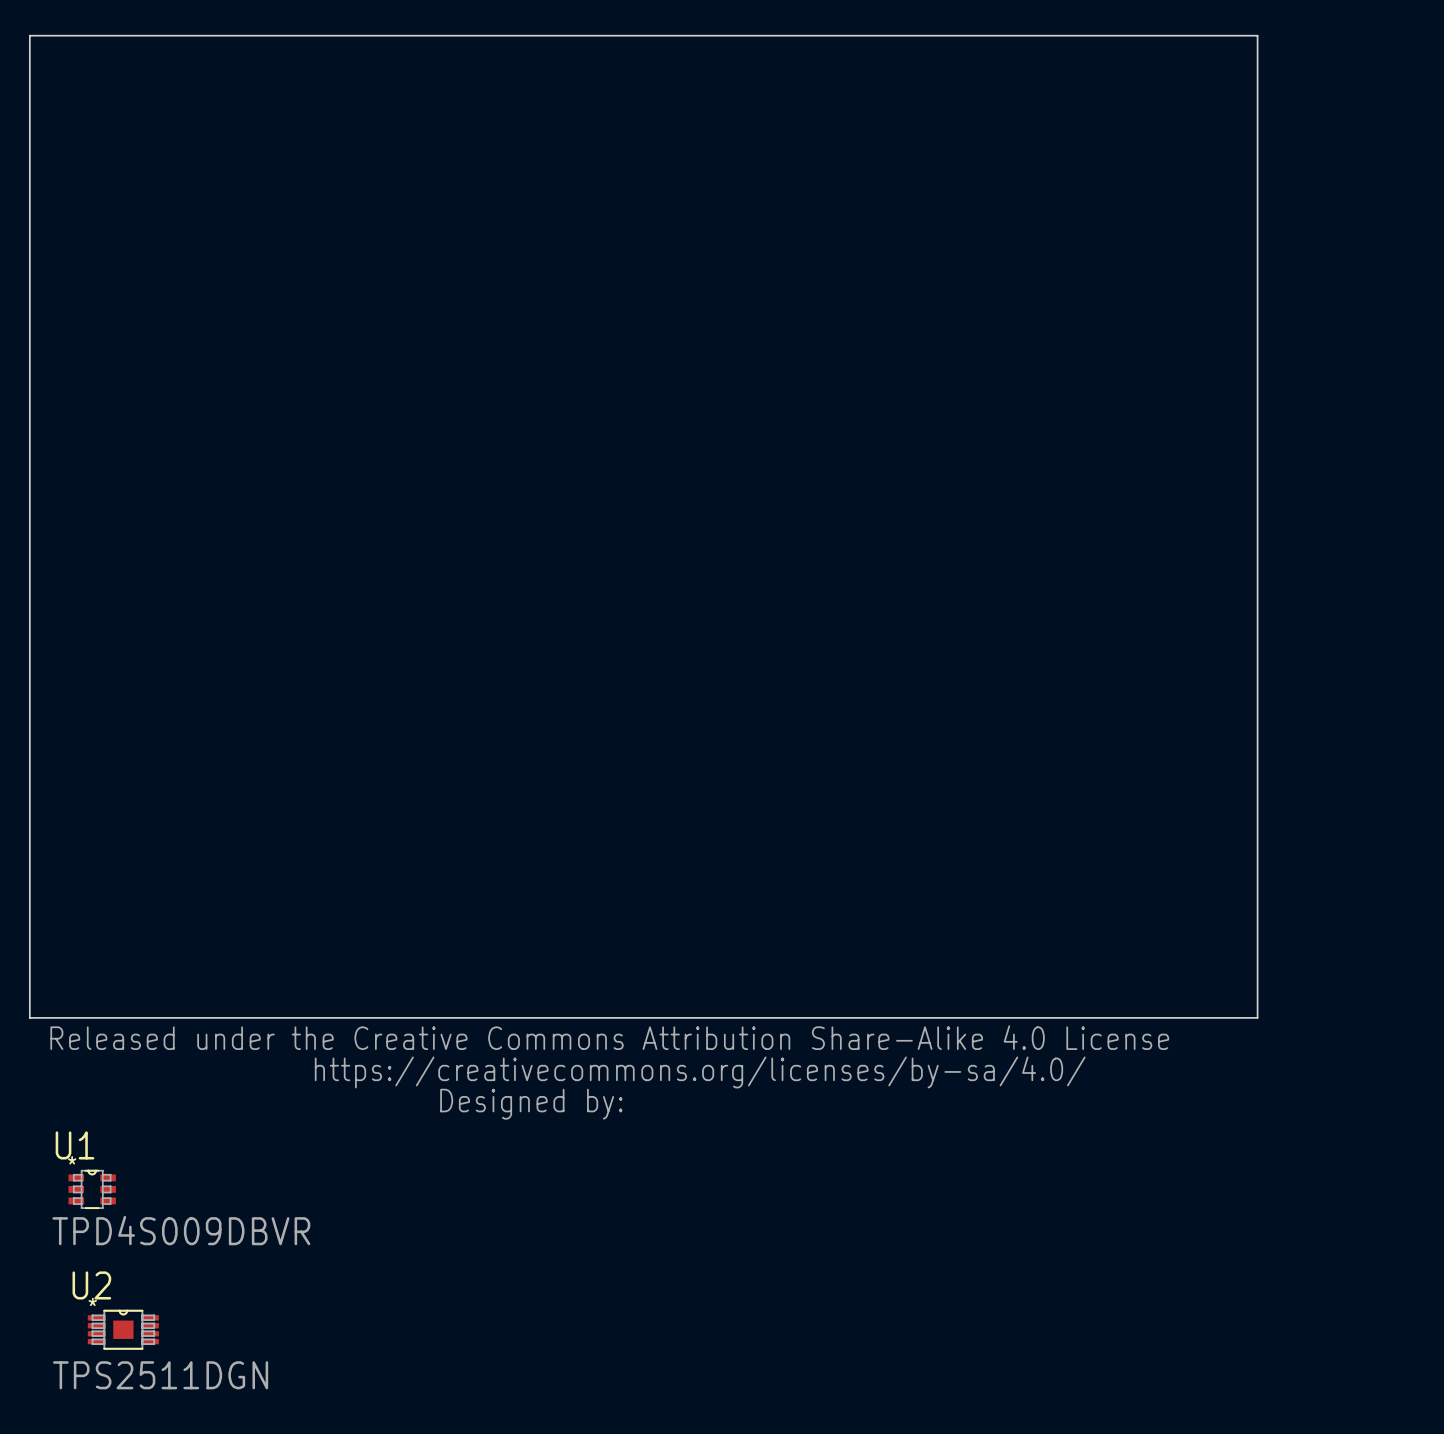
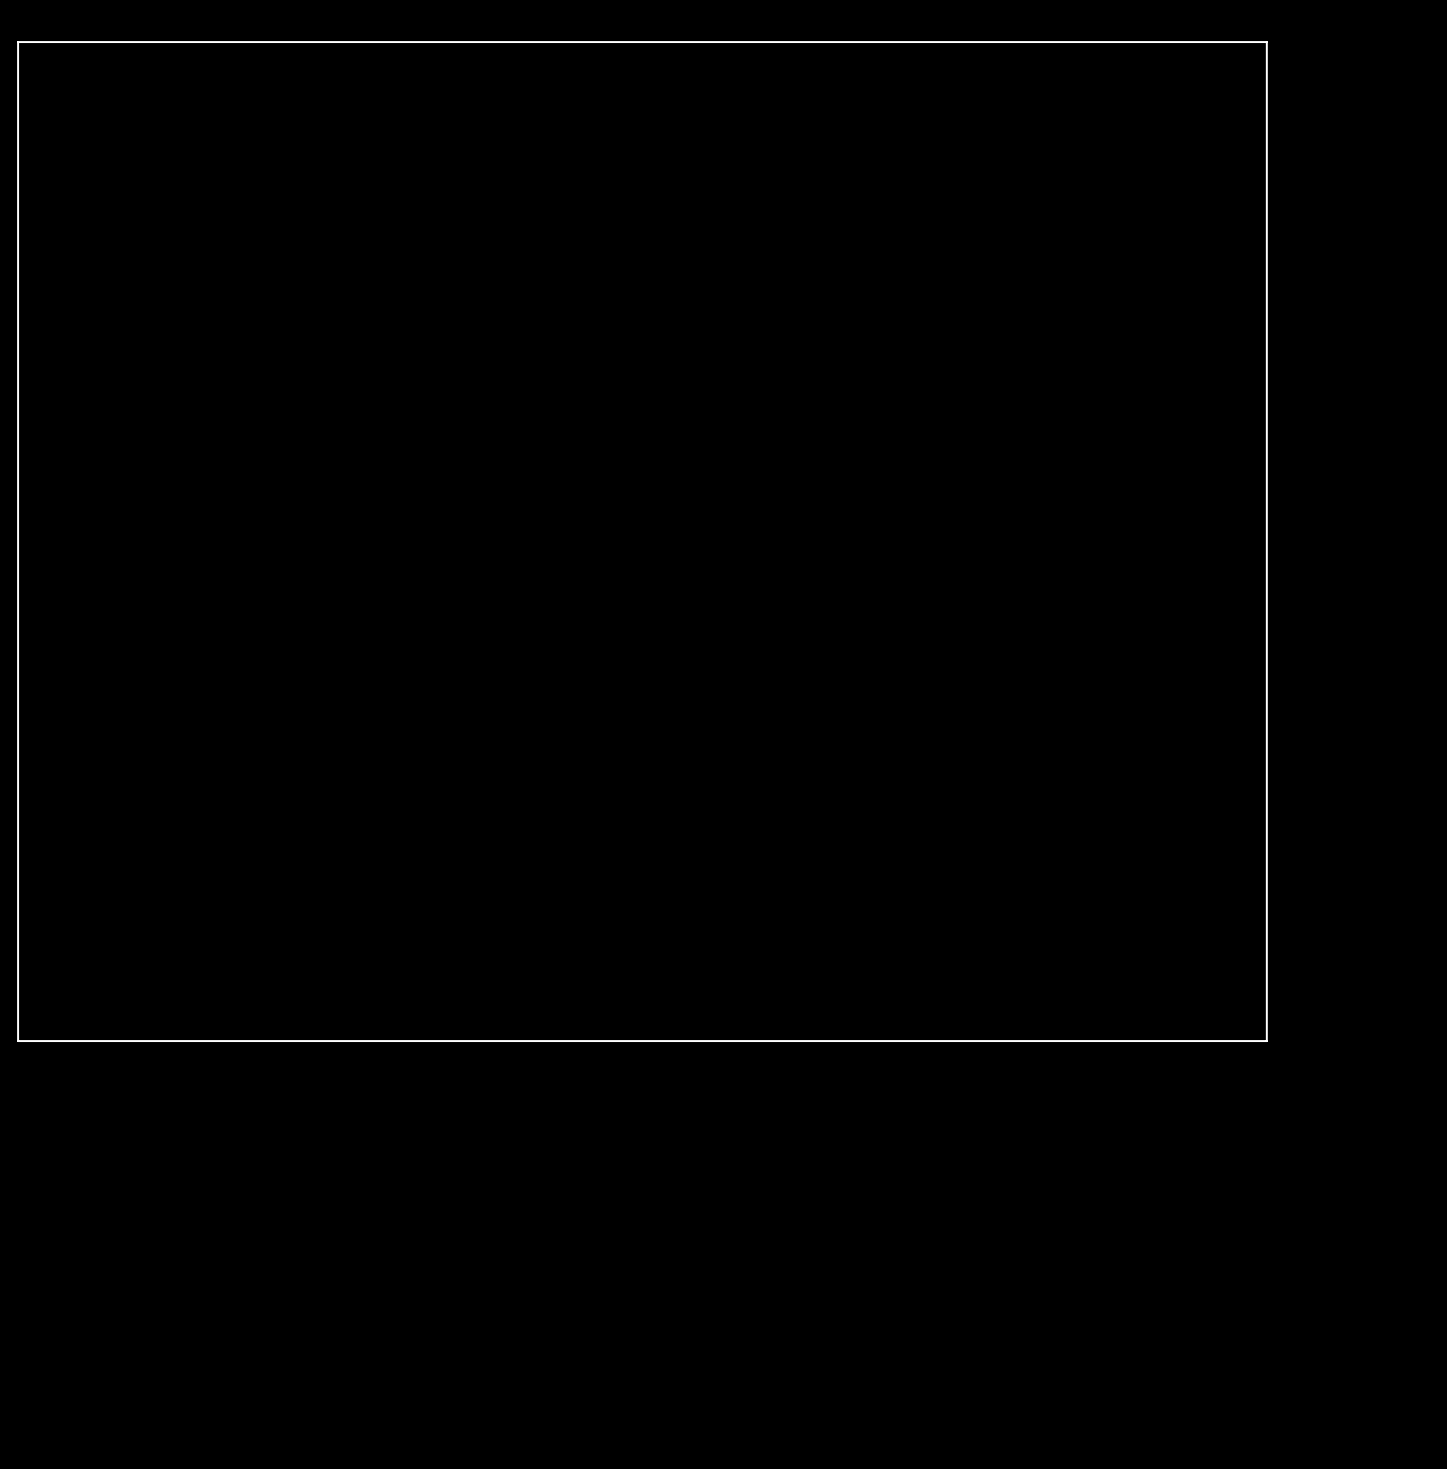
drawing: [50, 1025, 1170, 1120] -> none
U1: TPD4S009DBVR (92, 1189) -> none
U2: TPS2511DGN (123, 1329) -> none

